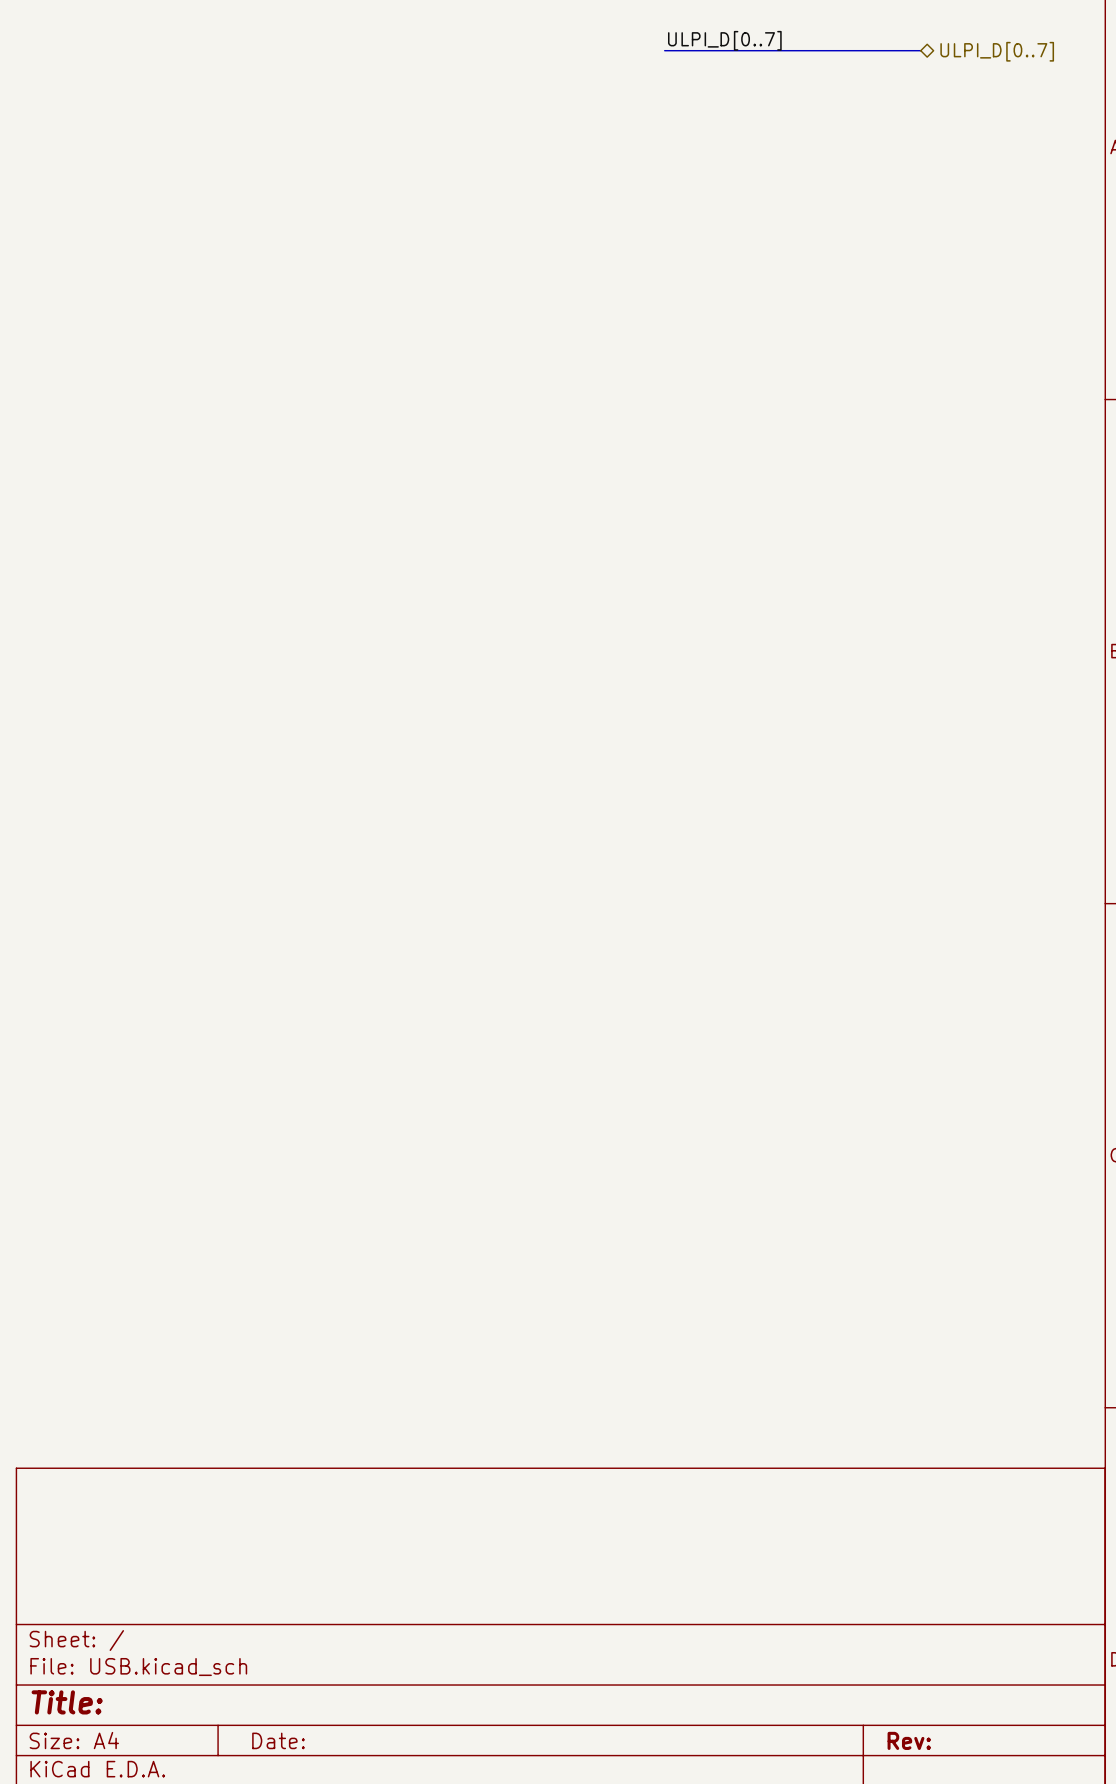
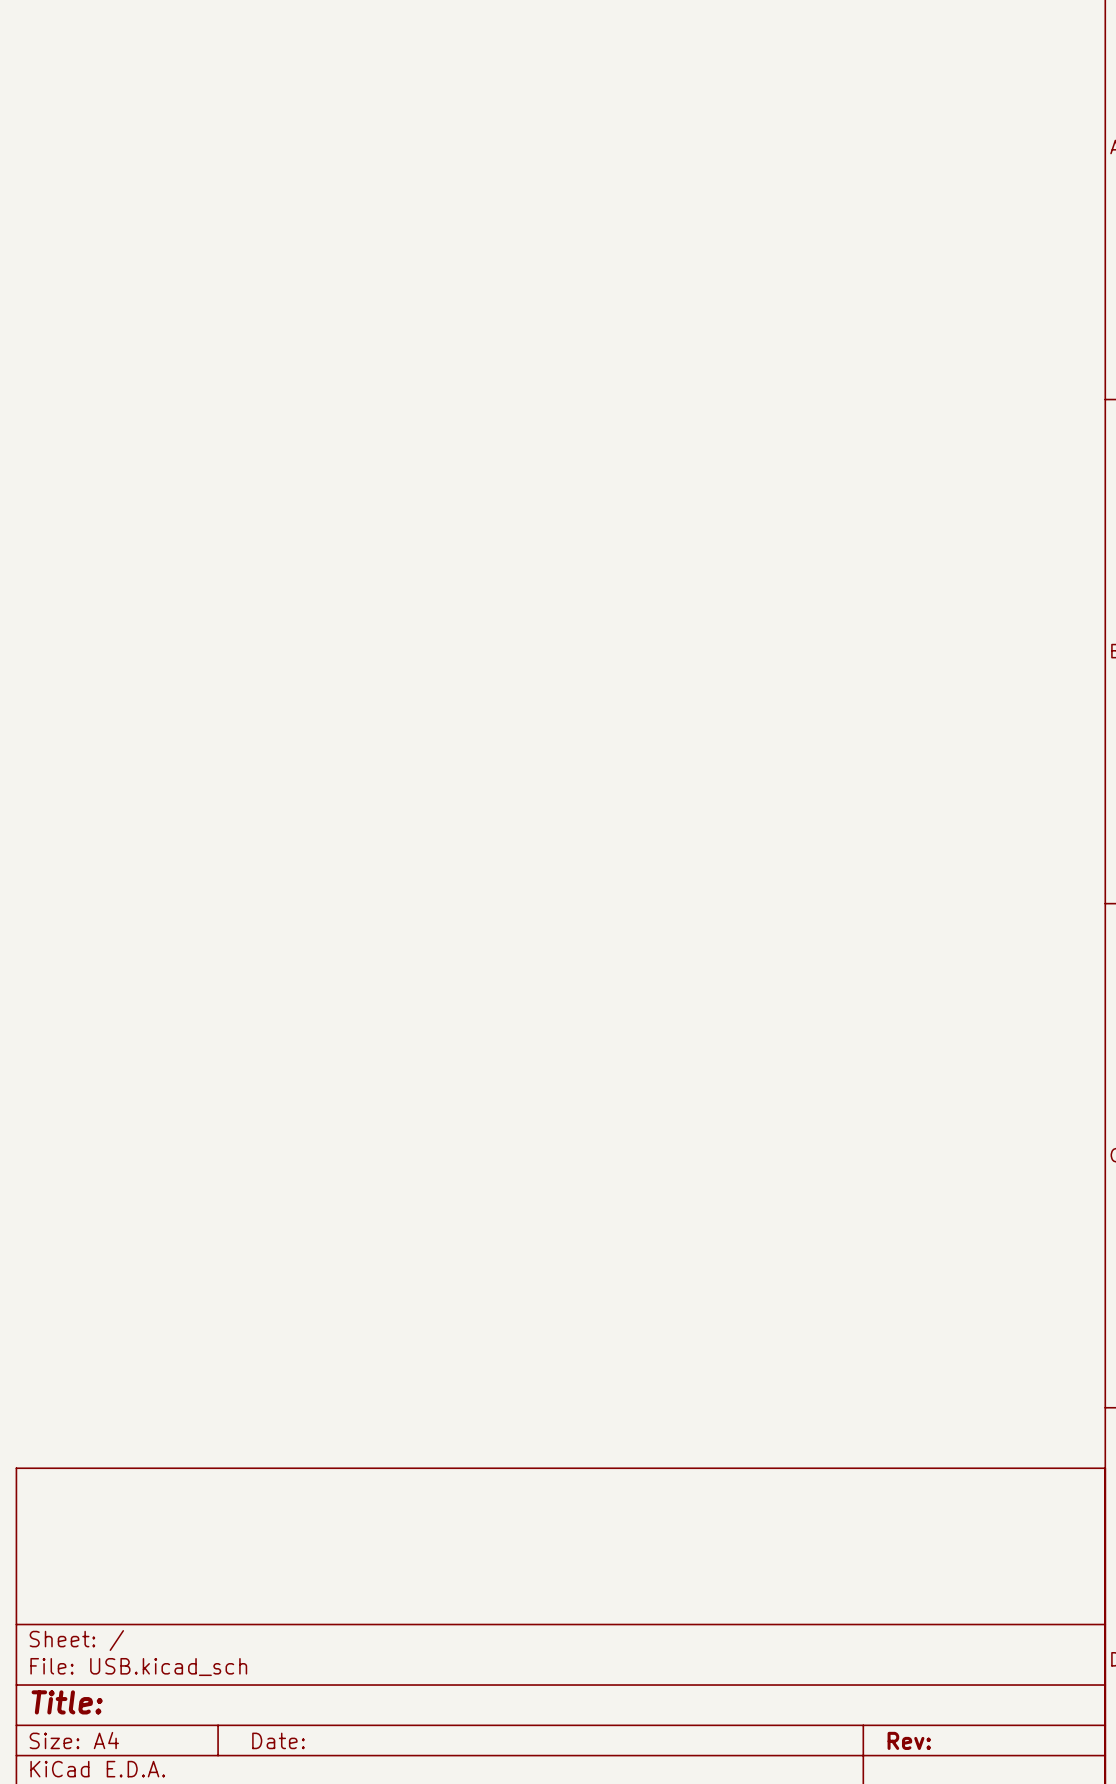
label: ULPI_D[0..7] (724, 40) -> none
bus: (664, 50) (920, 50) -> none
hierarchical label: ULPI_D[0..7] (997, 51) -> none

